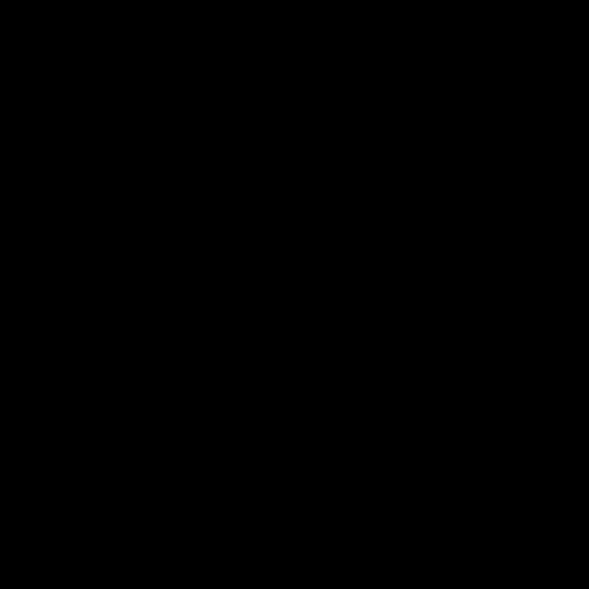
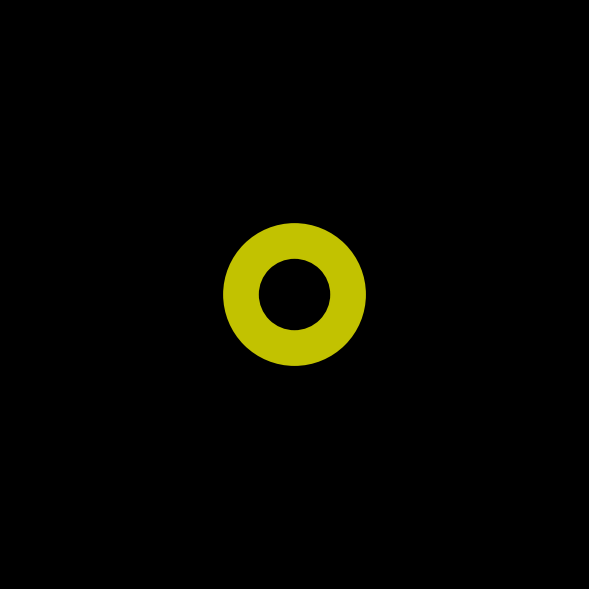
part: none -> (294, 294)

